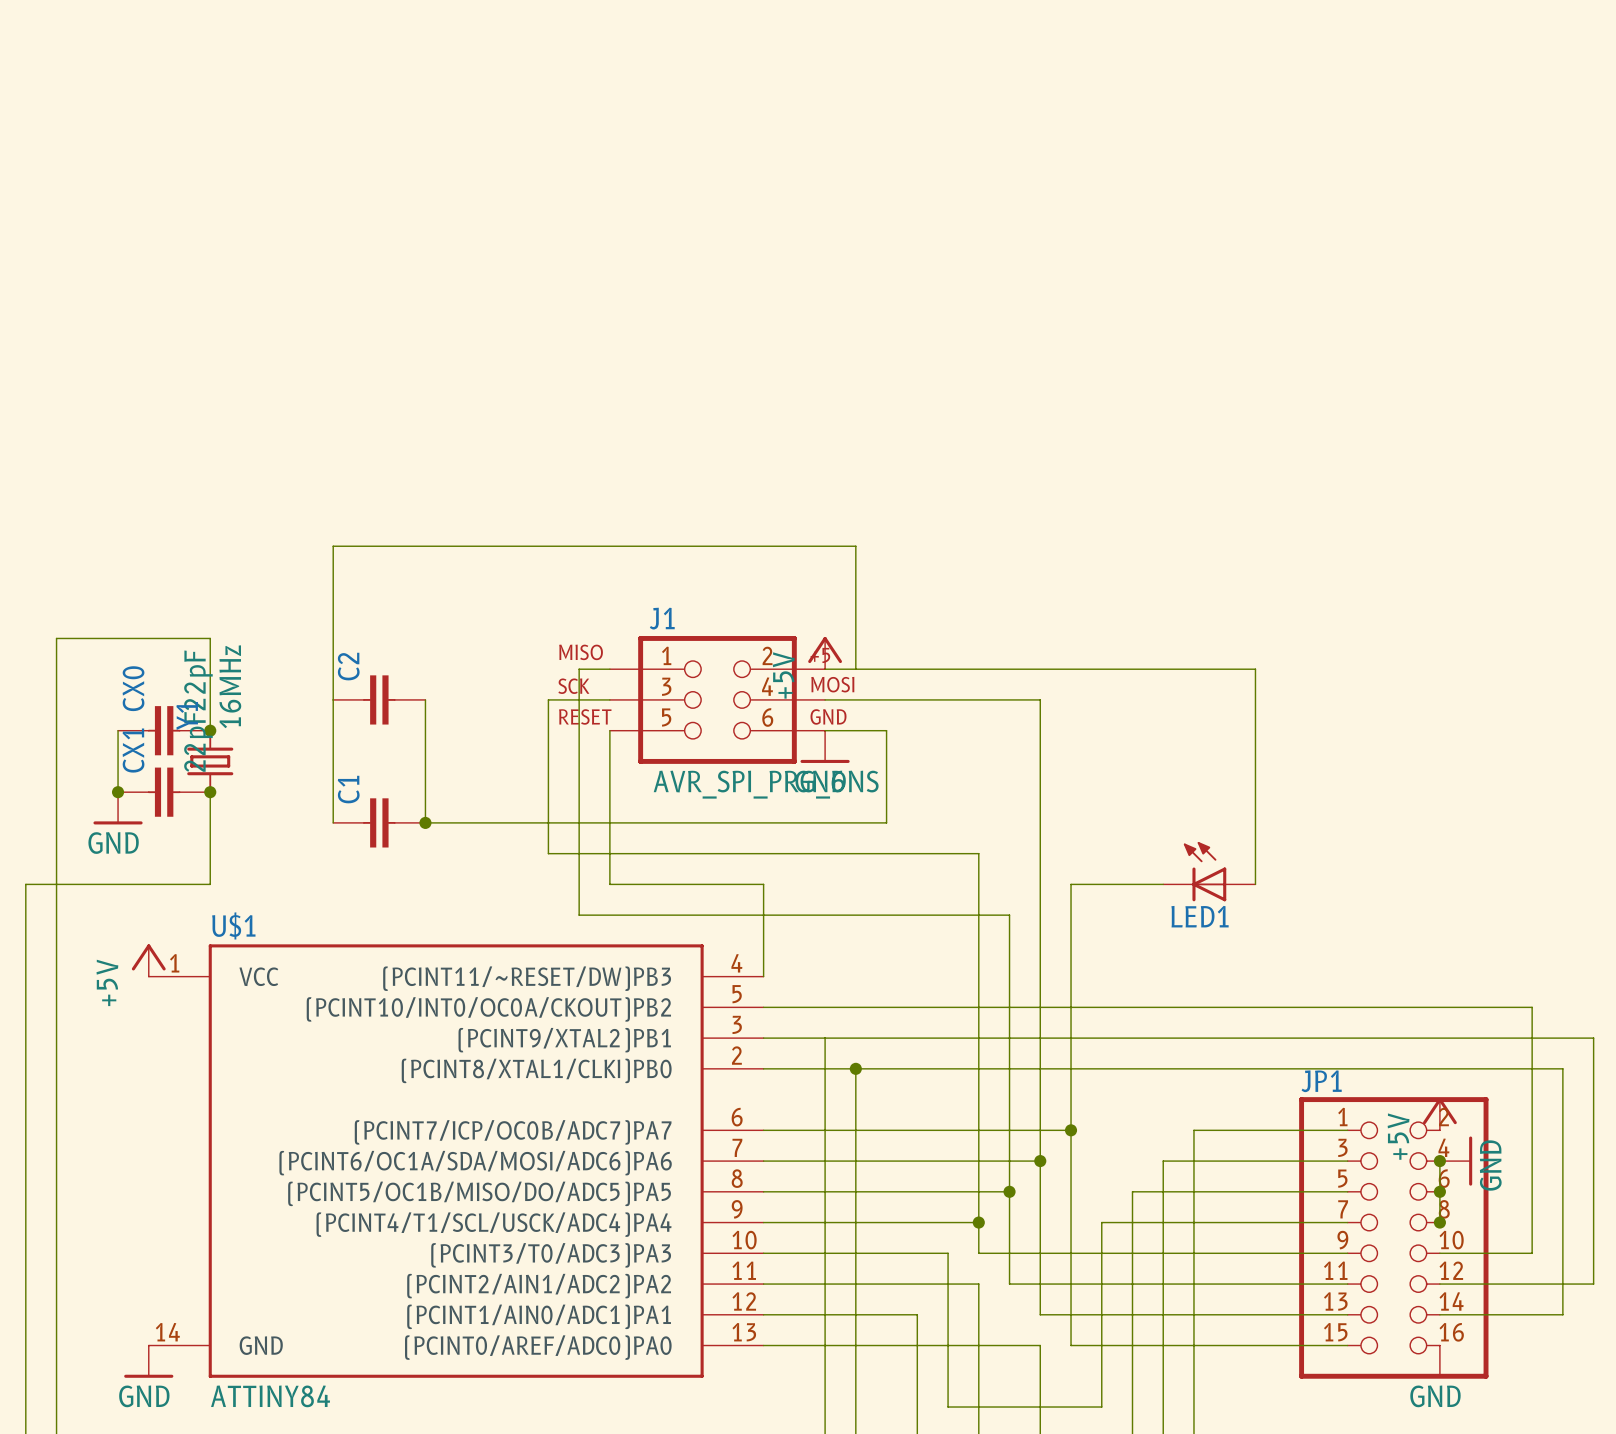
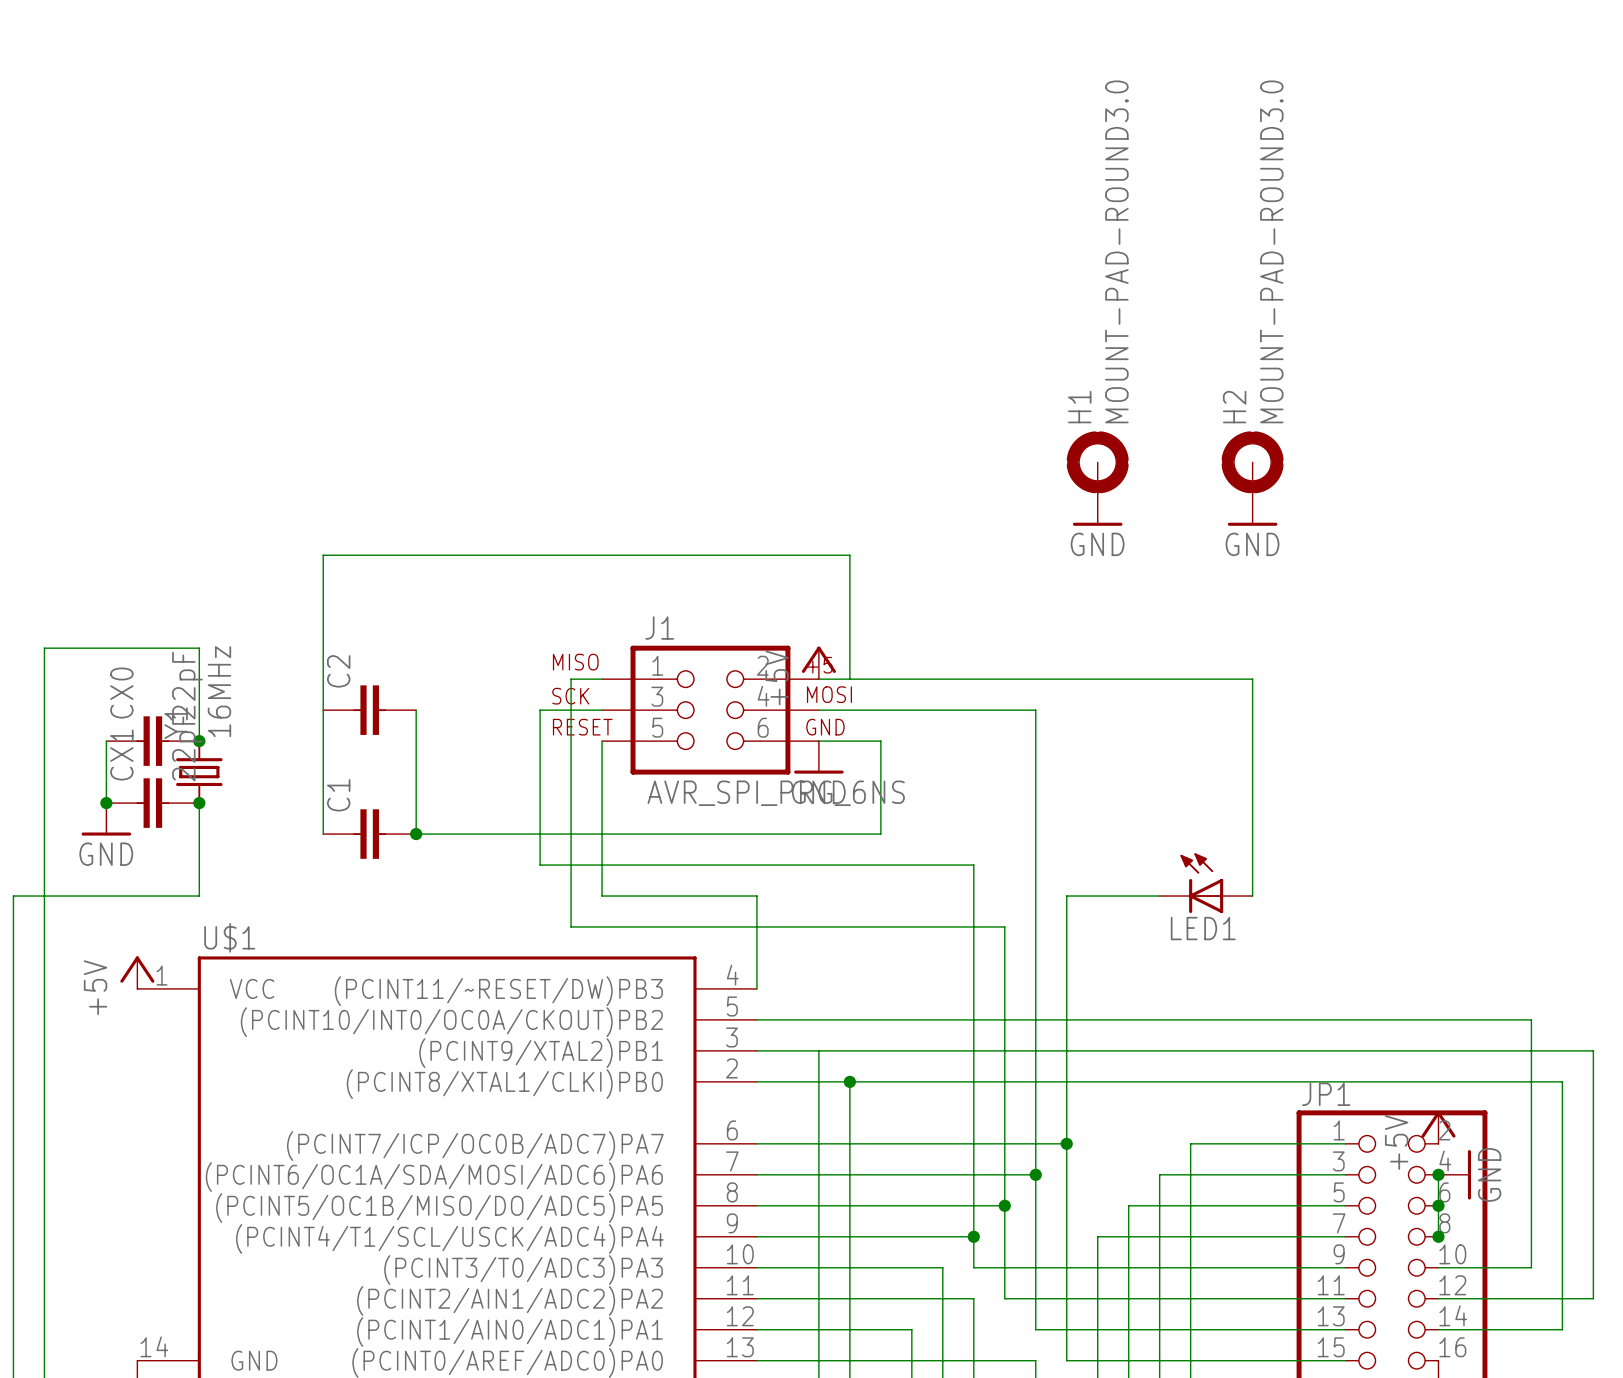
H1: none -> MOUNT-PAD-ROUND3.0 (1097, 462)
H2: none -> MOUNT-PAD-ROUND3.0 (1252, 462)
power symbol: none -> GND (1097, 509)
power symbol: none -> GND (1252, 509)

